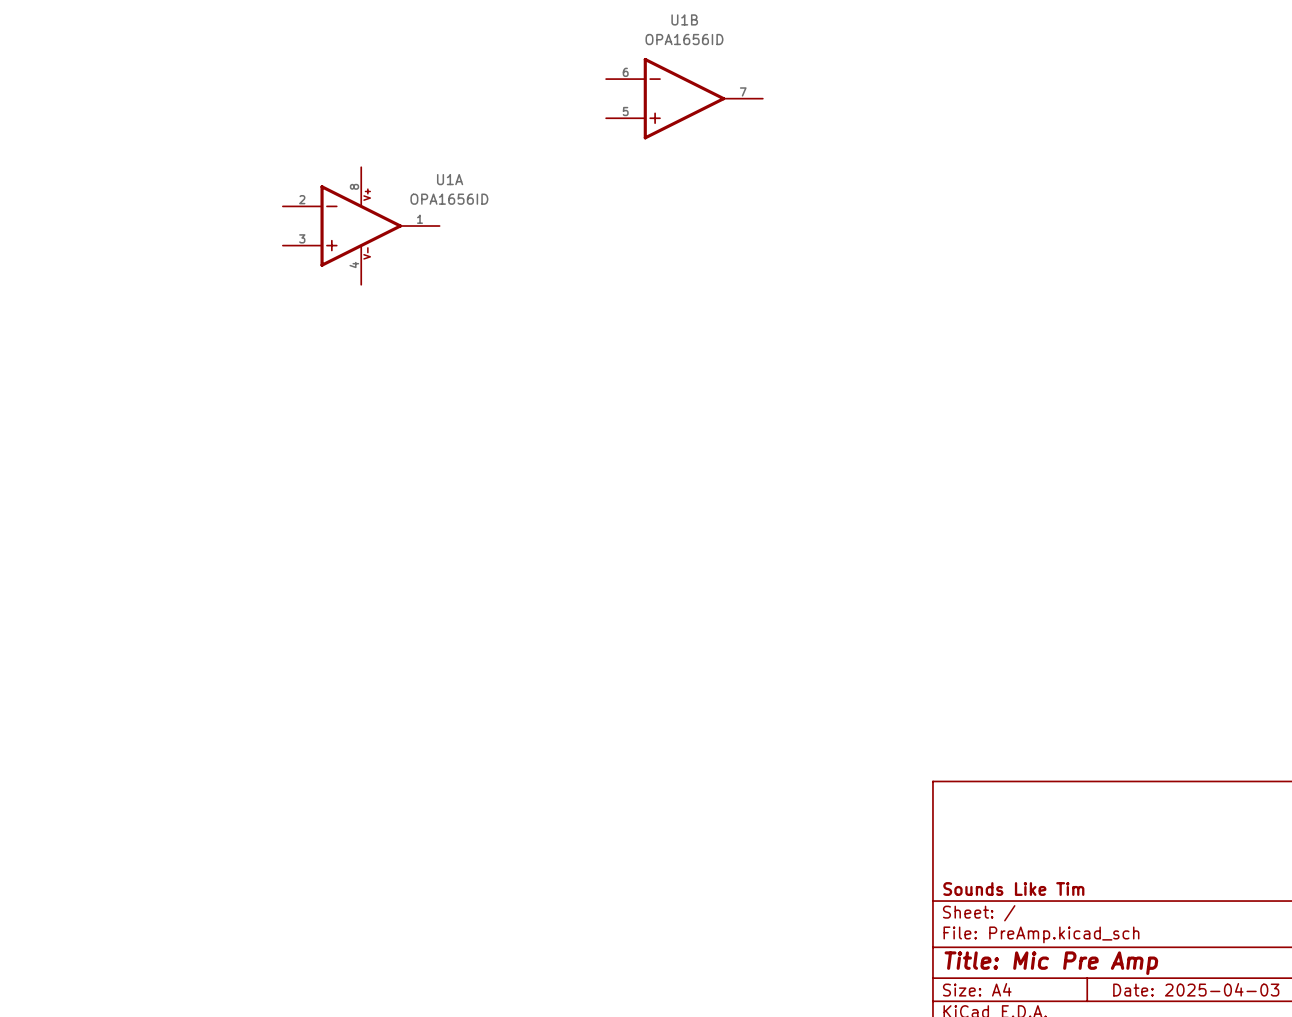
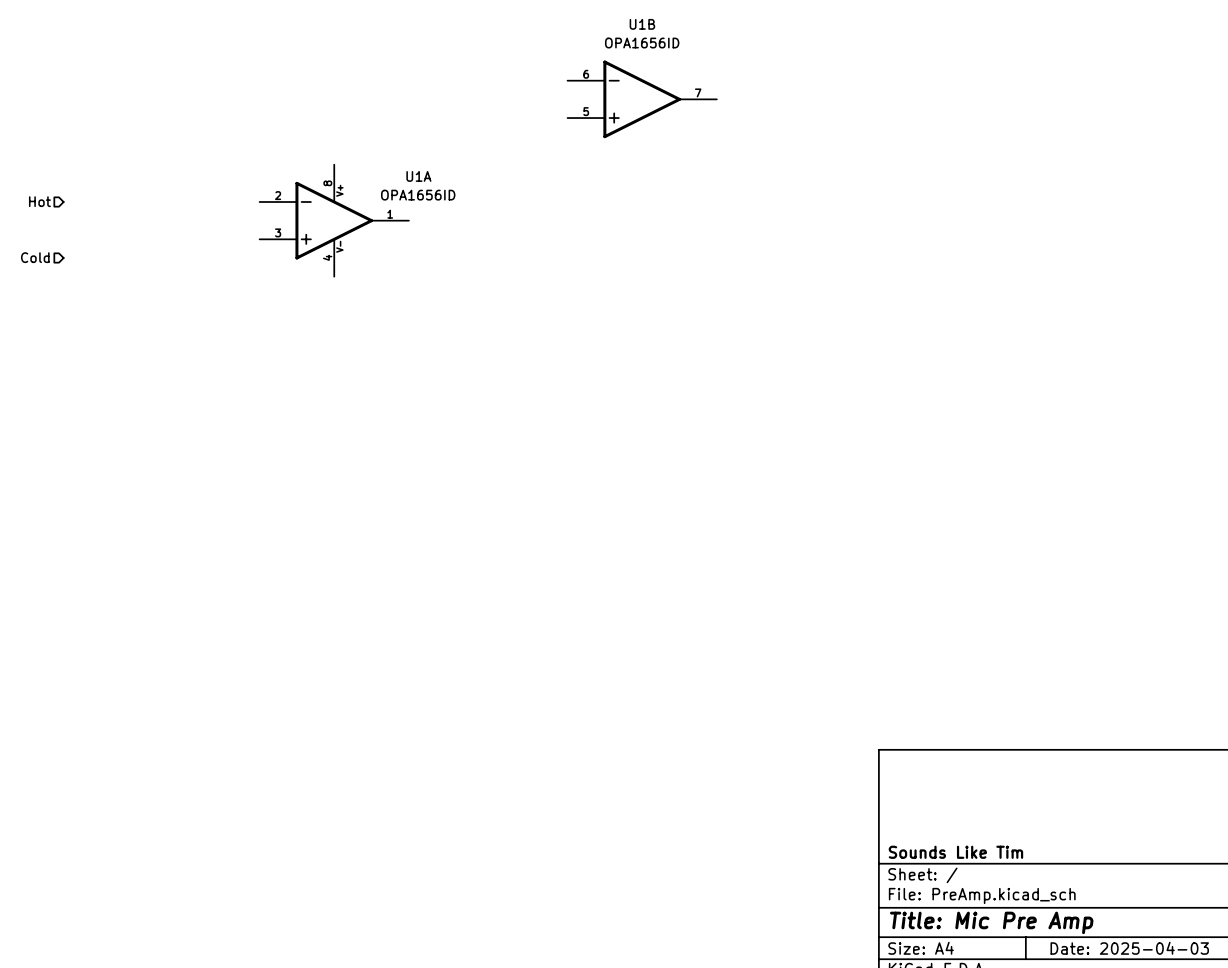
hierarchical label: none -> Hot (39, 201)
hierarchical label: none -> Cold (35, 257)

